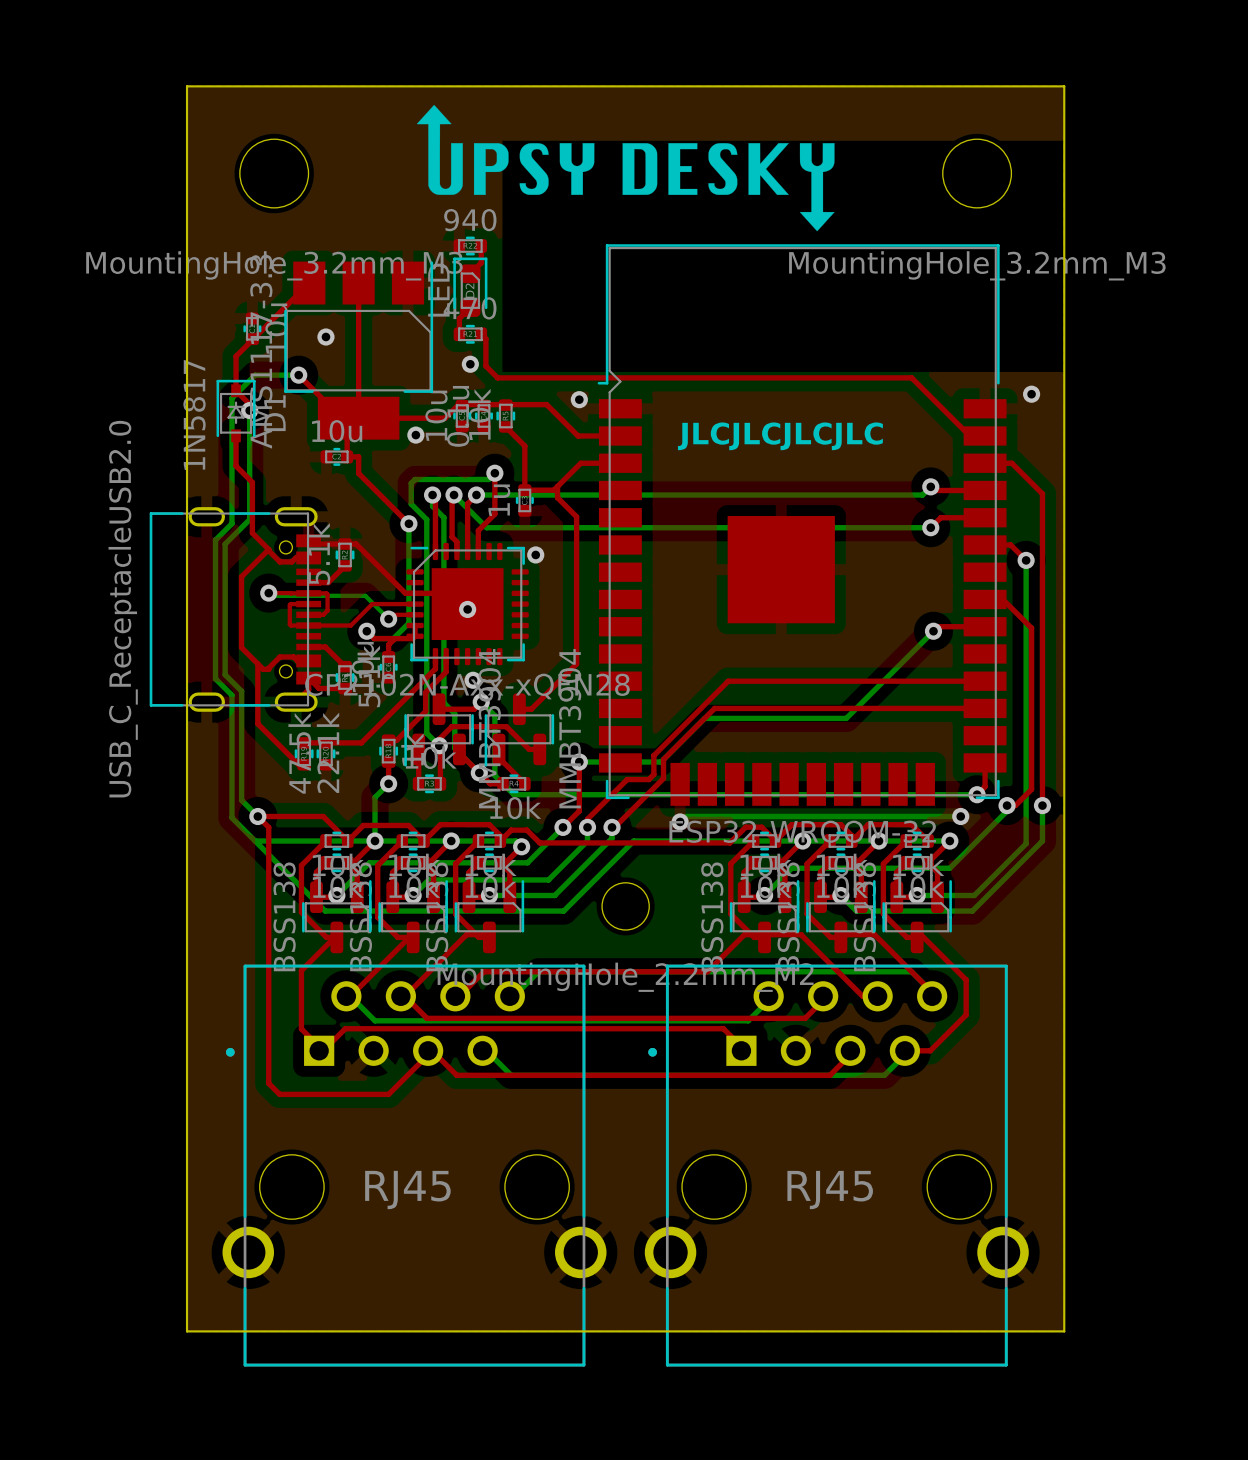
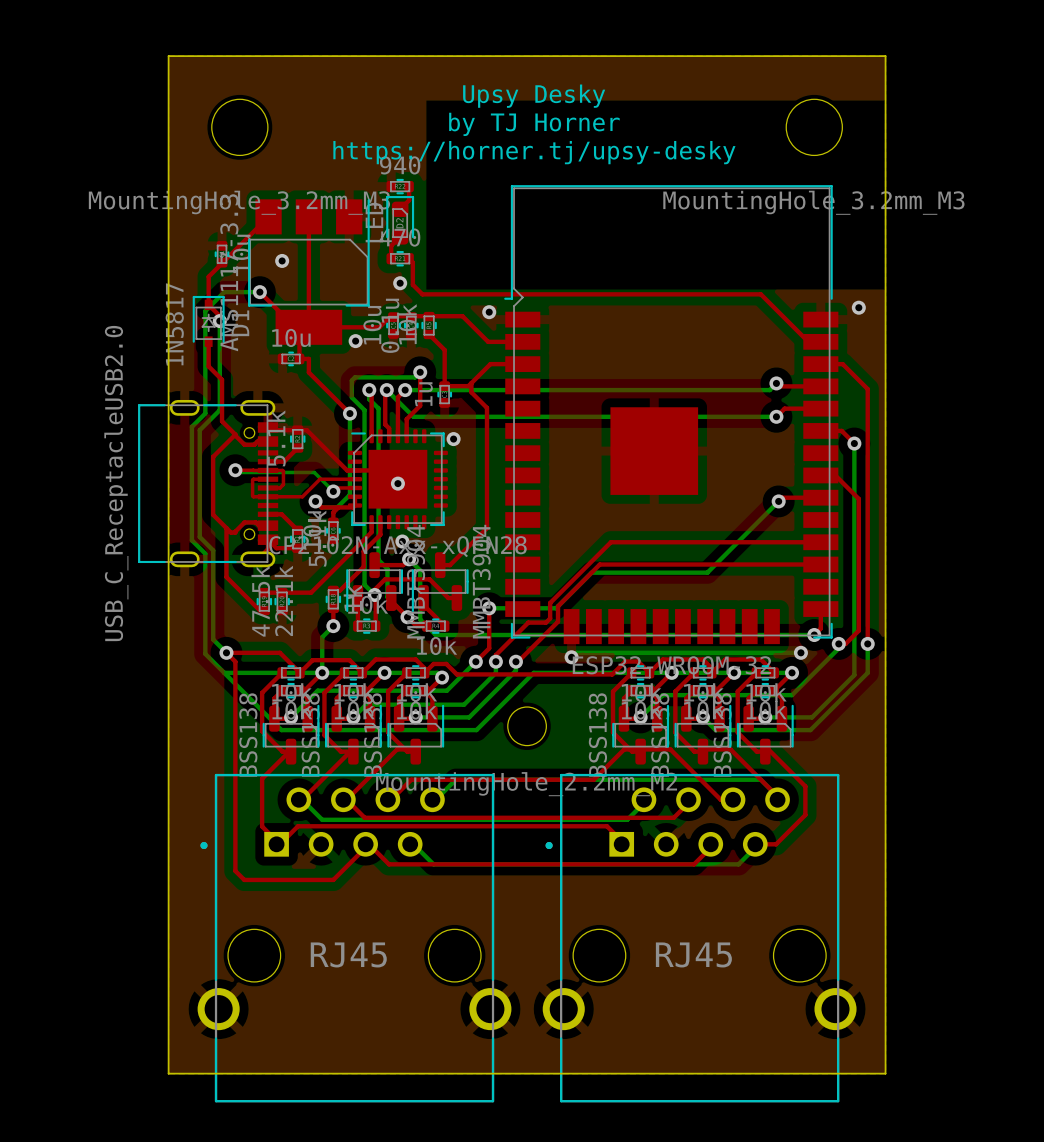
drawing: [416, 104, 835, 232] -> none
text: none -> Upsy Desky (534, 96)
text: none -> by TJ Horner (534, 124)
text: none -> https://horner.tj/upsy-desky (534, 152)
text: JLCJLCJLCJLC (780, 436) -> none

